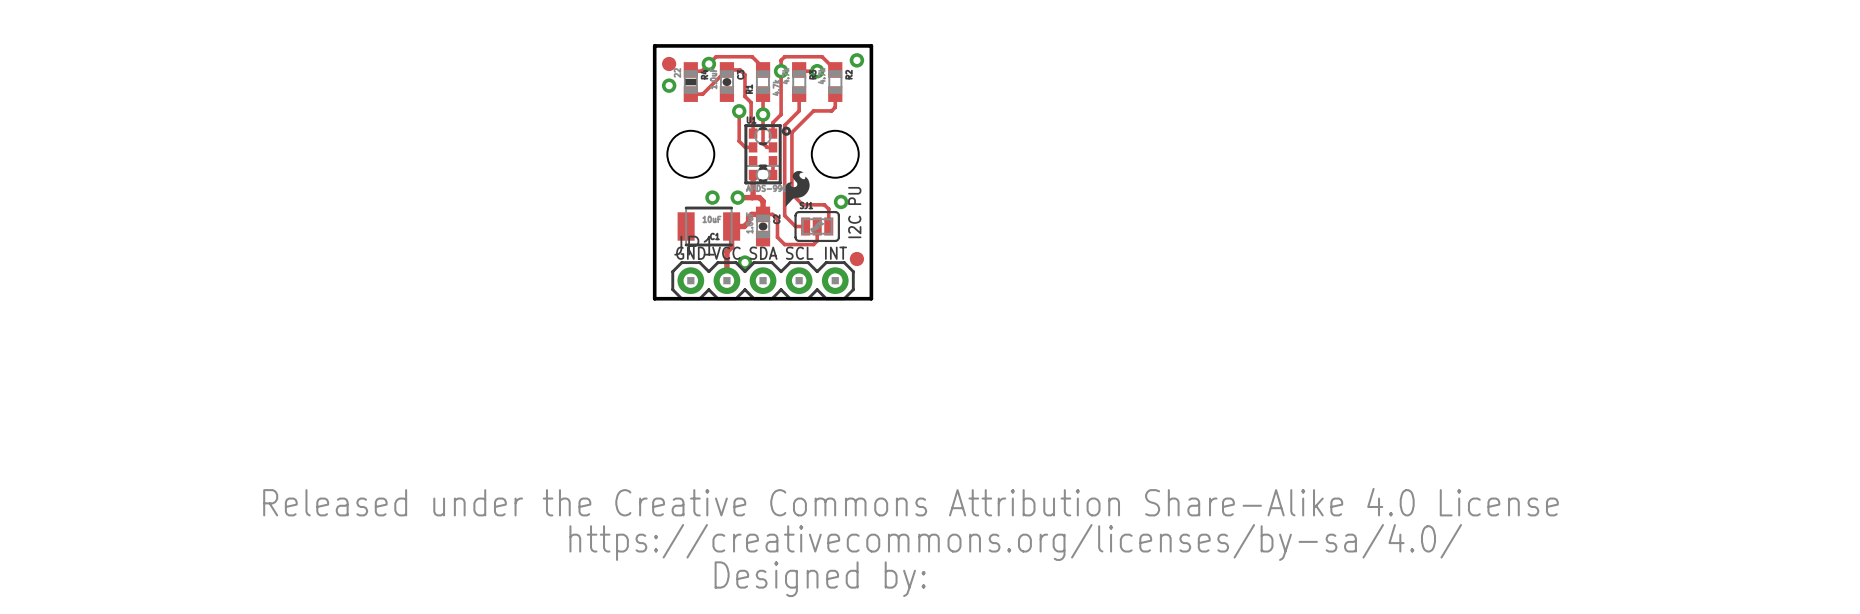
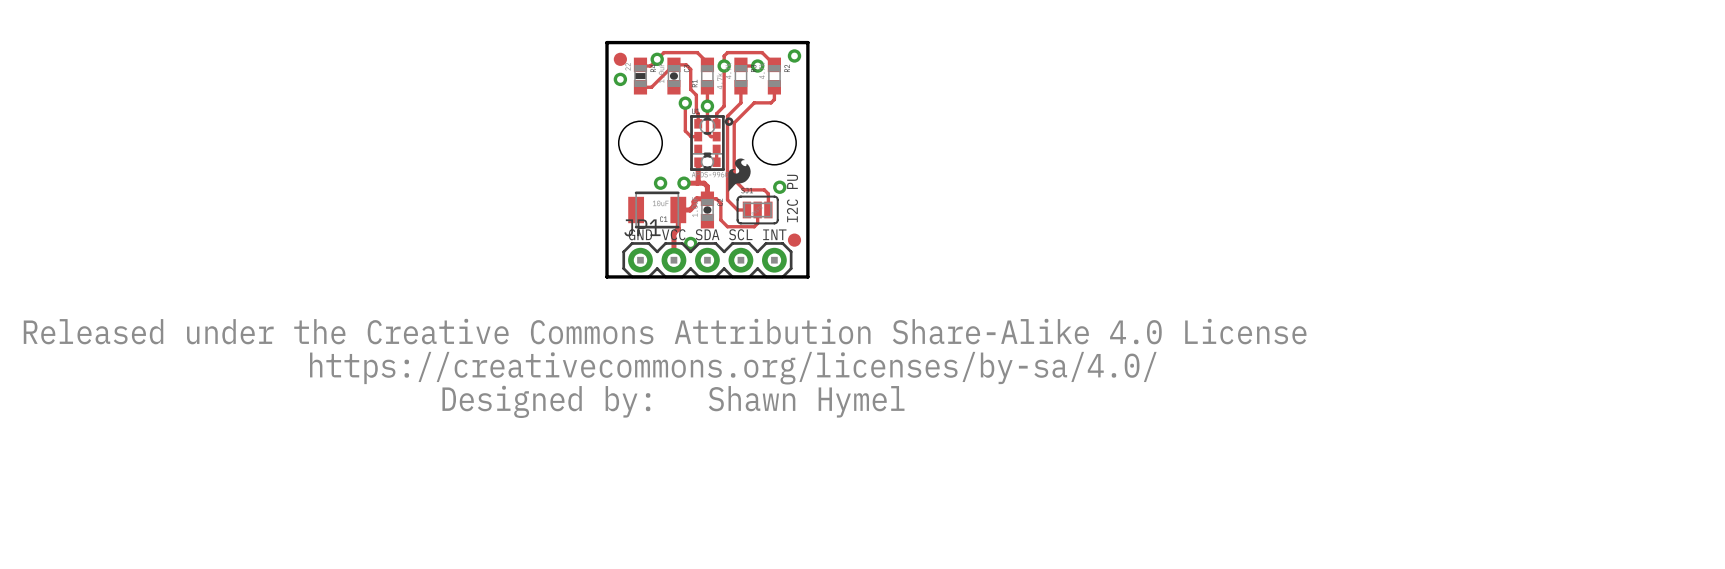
text: none -> Shawn Hymel (806, 401)
drawing position: (910, 542) -> (665, 368)

